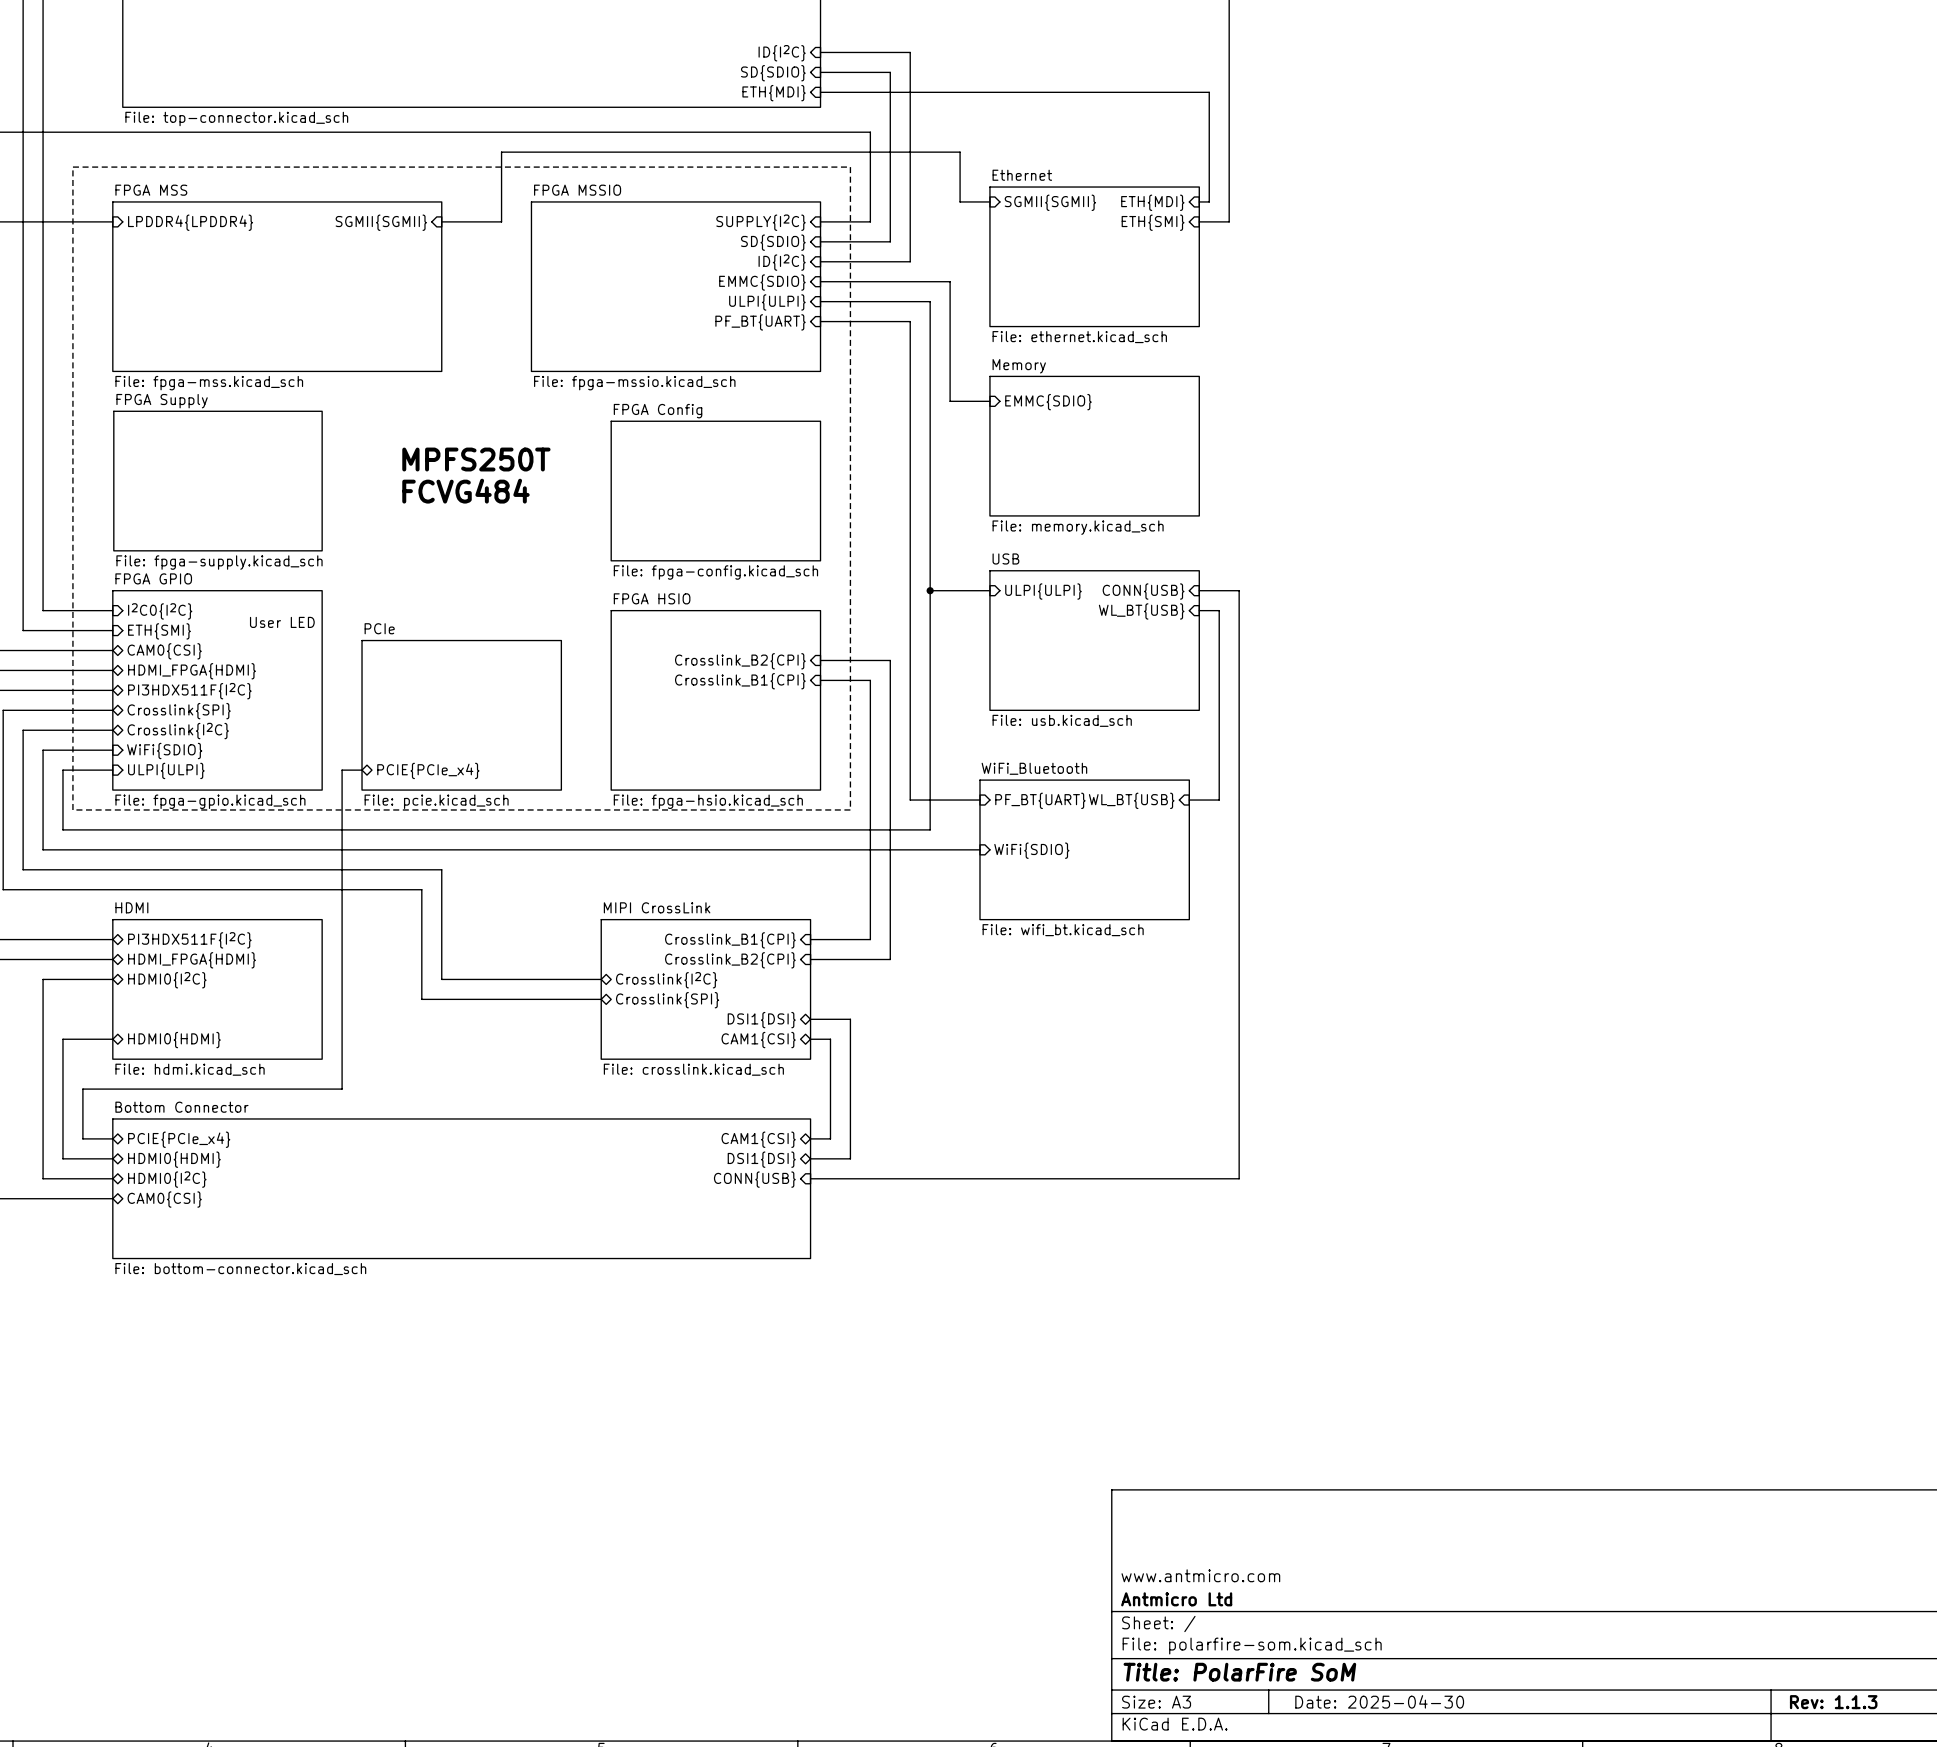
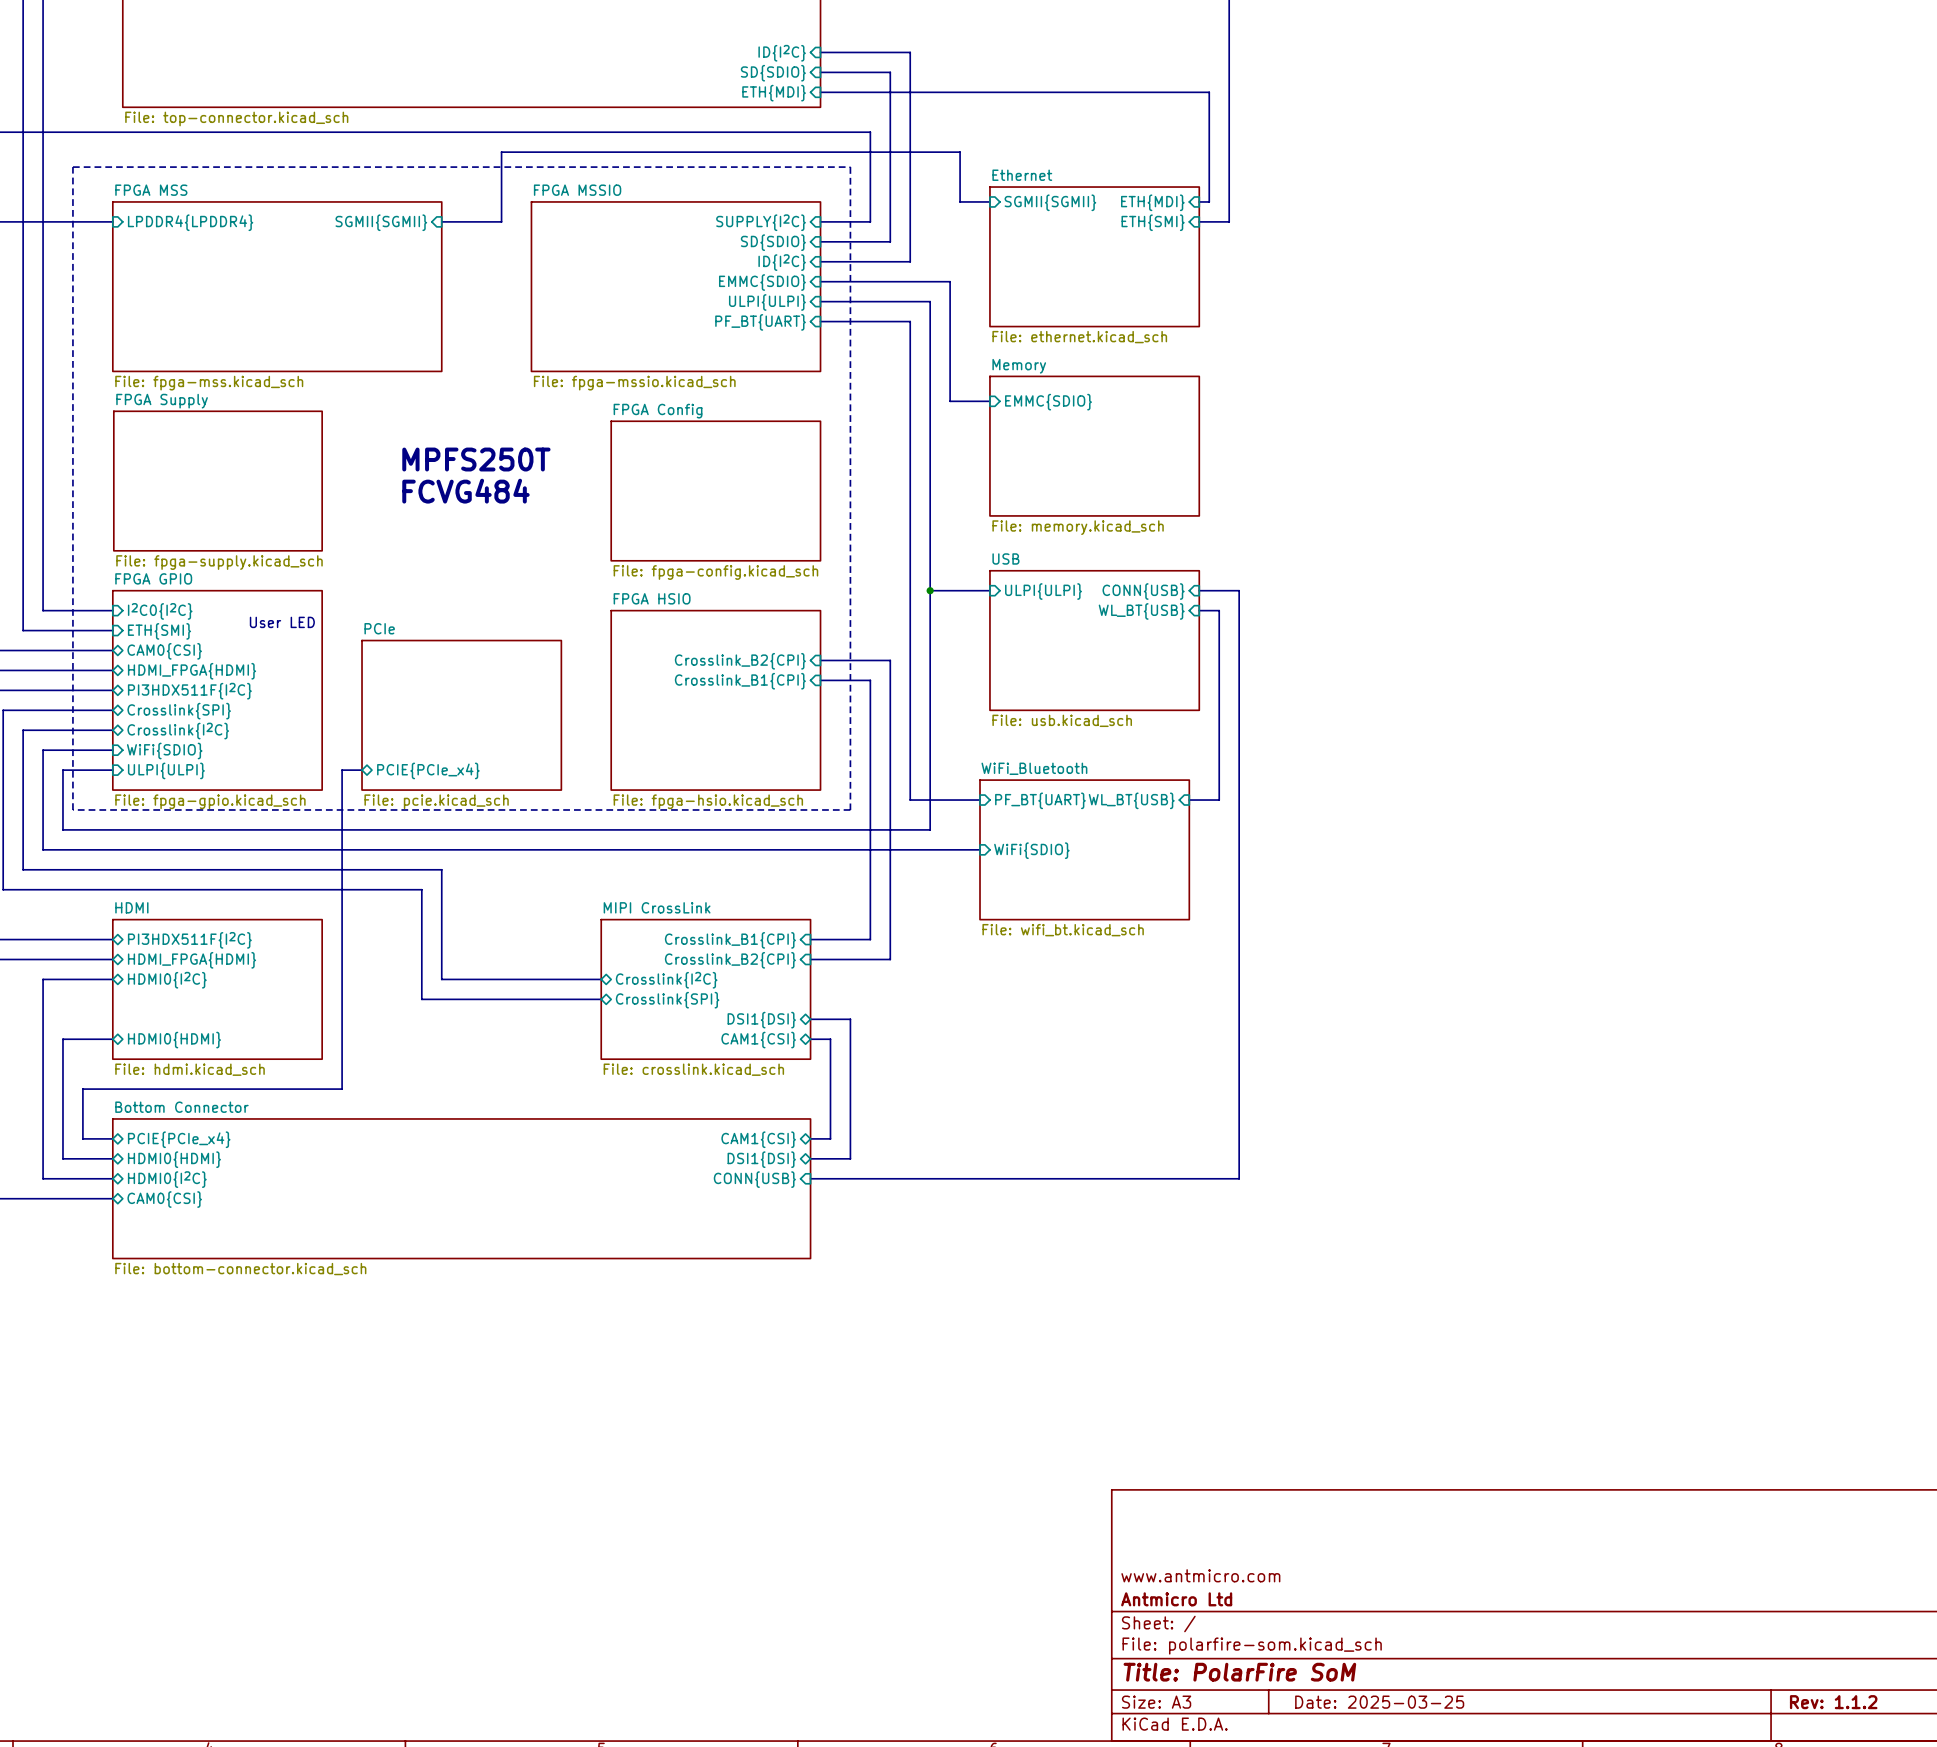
title block: Date: 2025-04-30 (1379, 1701) -> Date: 2025-03-25 (1379, 1702)
title block: Rev: 1.1.3 (1833, 1702) -> Rev: 1.1.2 (1833, 1702)

